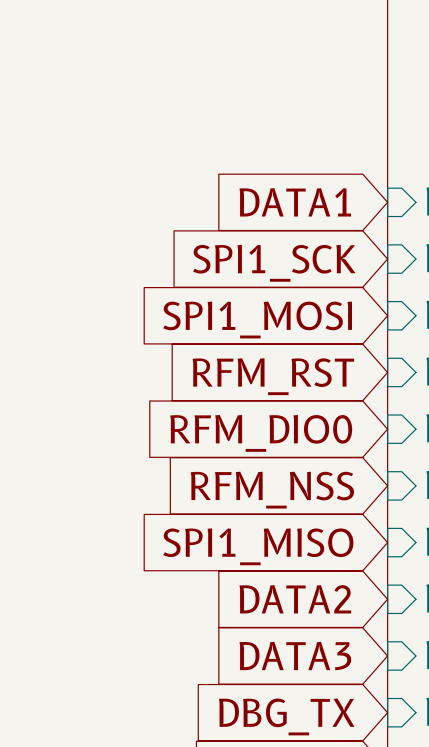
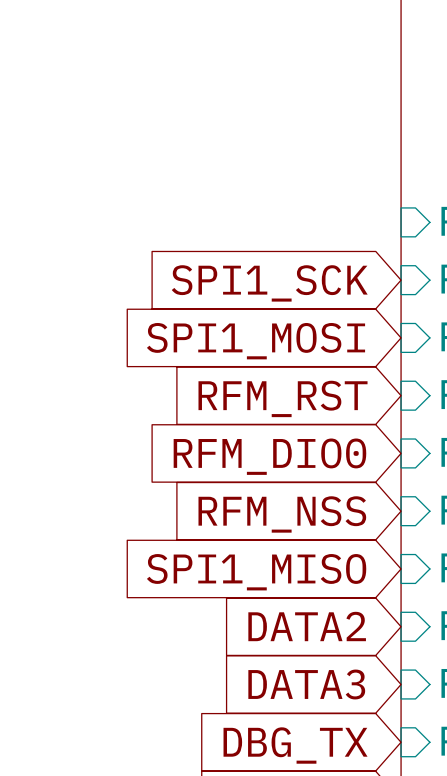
global label: DATA1 (295, 202) -> none

